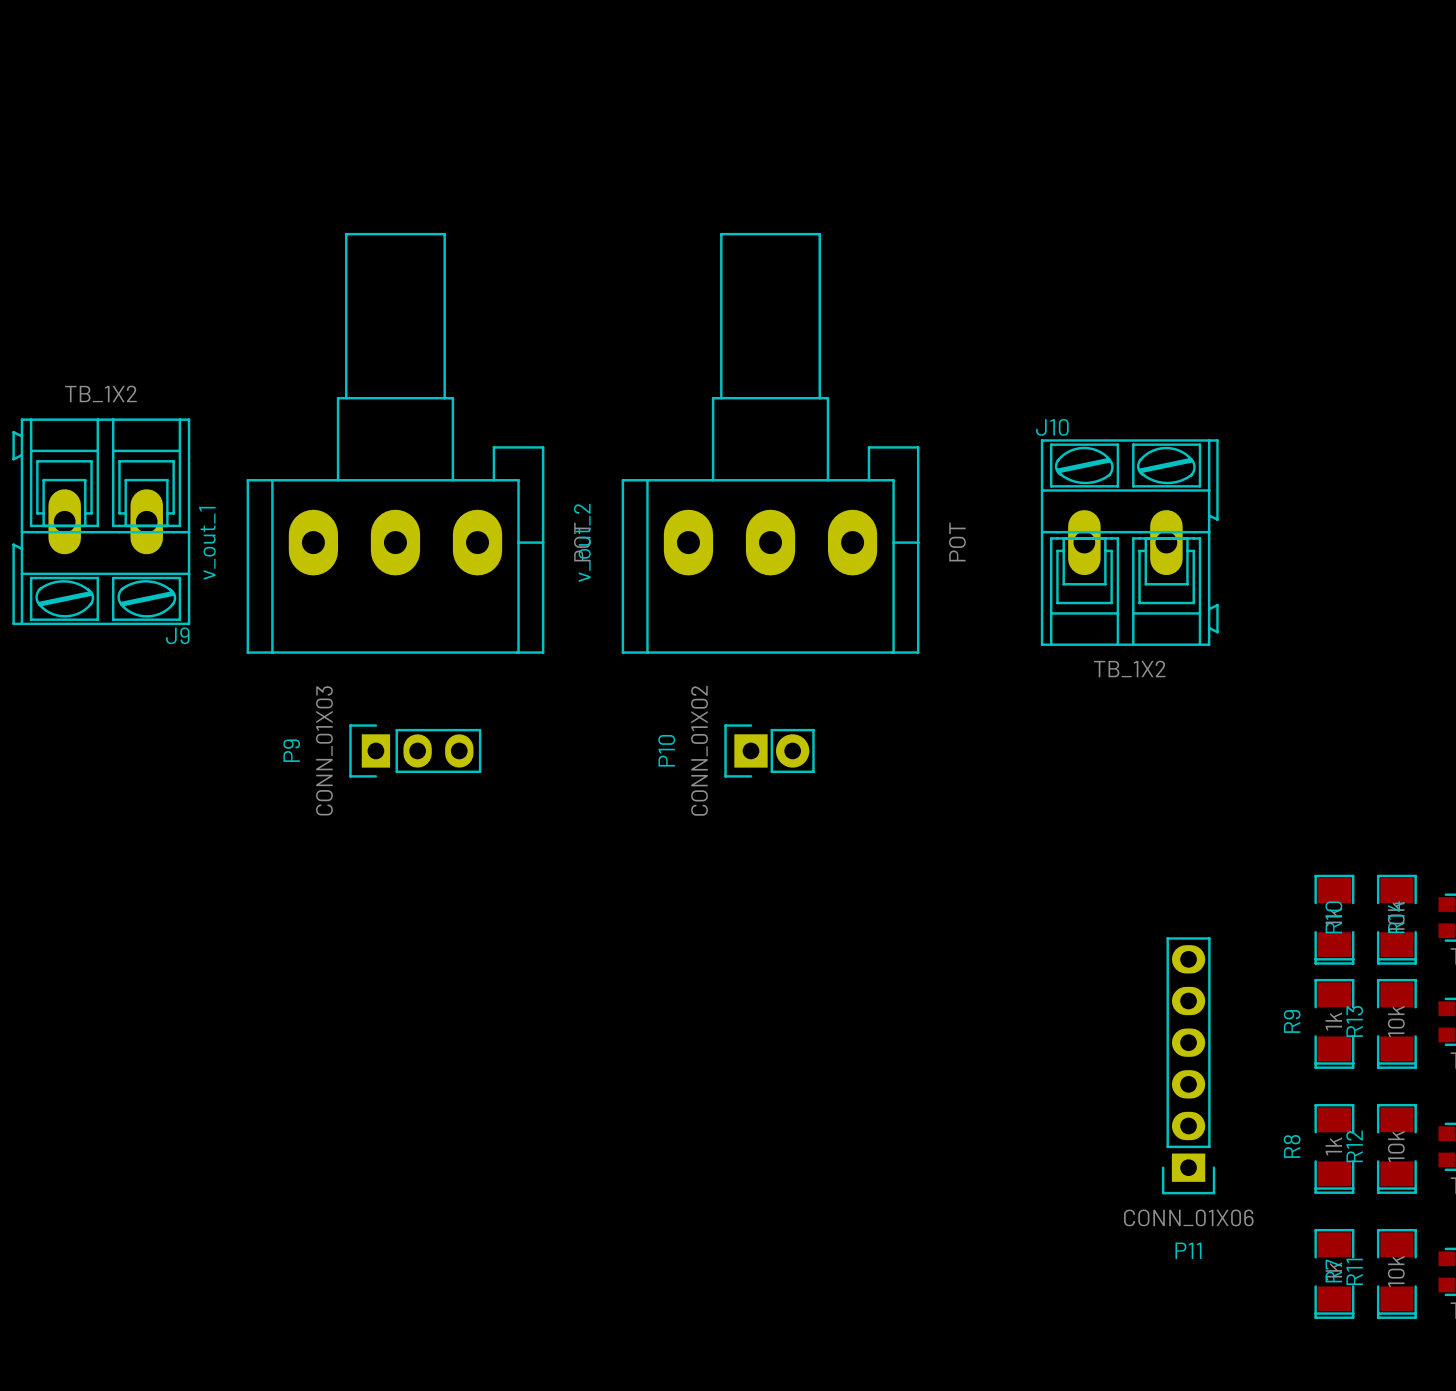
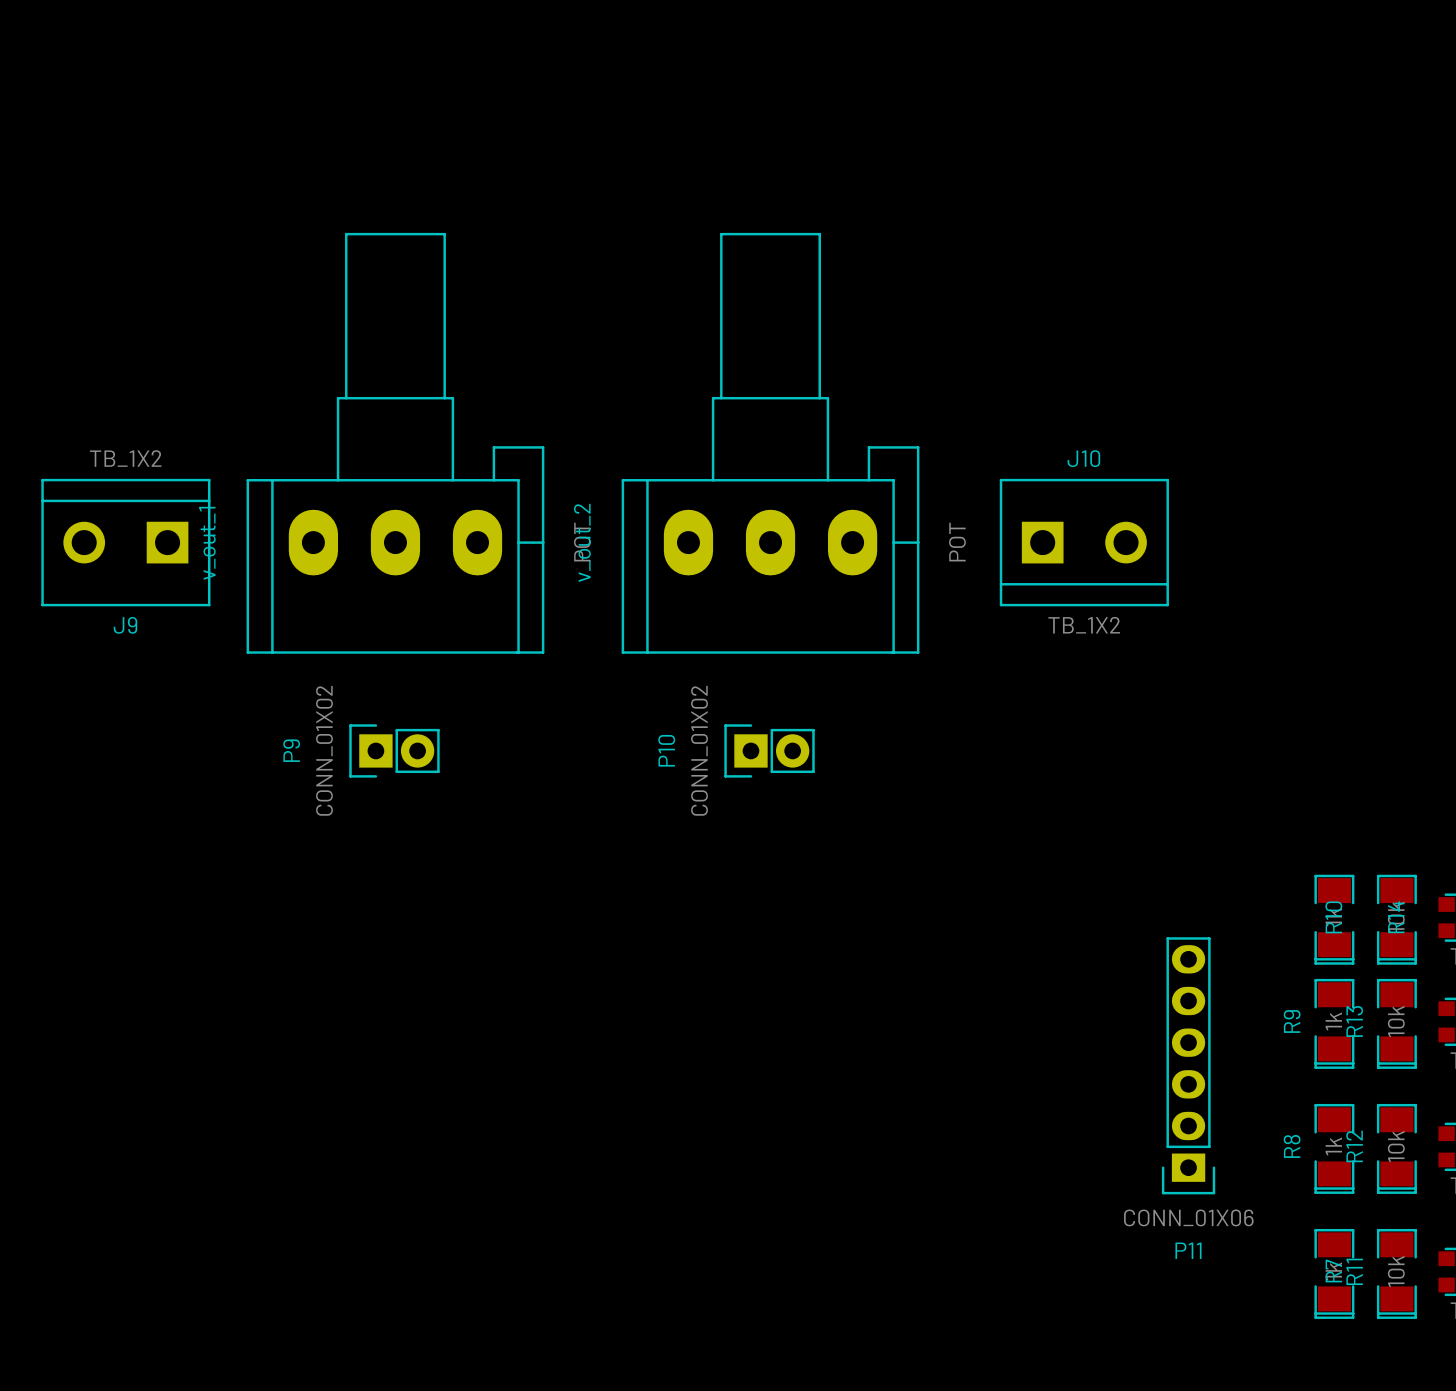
J9 value position: TB_1X2 (100, 393) -> TB_1X2 (125, 458)
J9 footprint: [12, 418, 191, 626] -> [41, 478, 211, 607]
J10 name position: J10 (1052, 427) -> J10 (1083, 458)
J10 footprint: [1040, 439, 1219, 646] -> [999, 478, 1169, 607]
J9 name position: J9 (177, 635) -> J9 (125, 625)
J10 value position: TB_1X2 (1129, 668) -> TB_1X2 (1084, 625)
P9 footprint: [349, 724, 482, 778] -> [349, 724, 440, 778]
P9 value: CONN_01X03 (324, 750) -> CONN_01X02 (324, 750)

